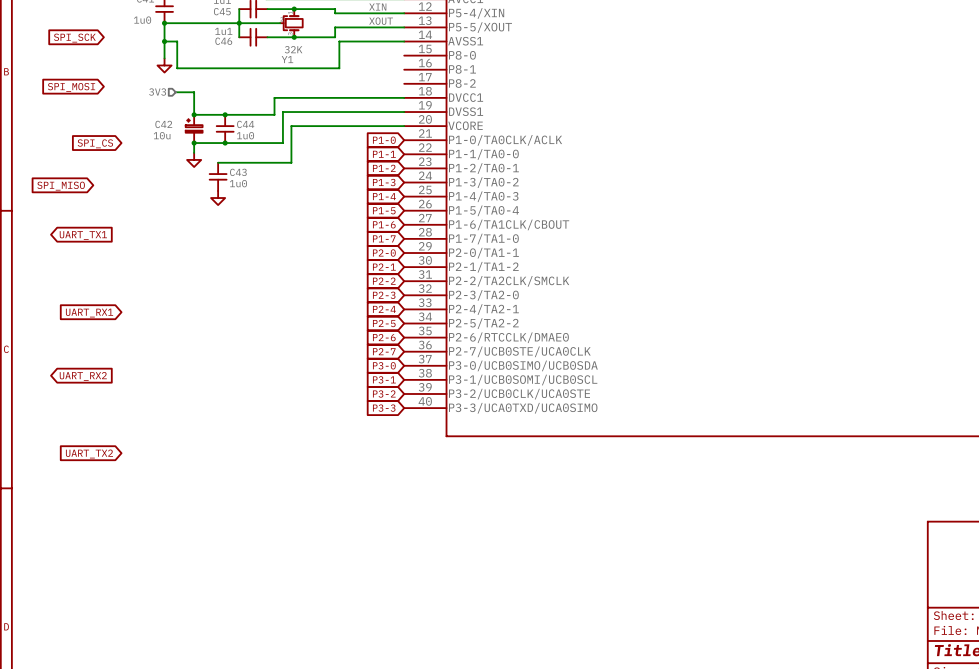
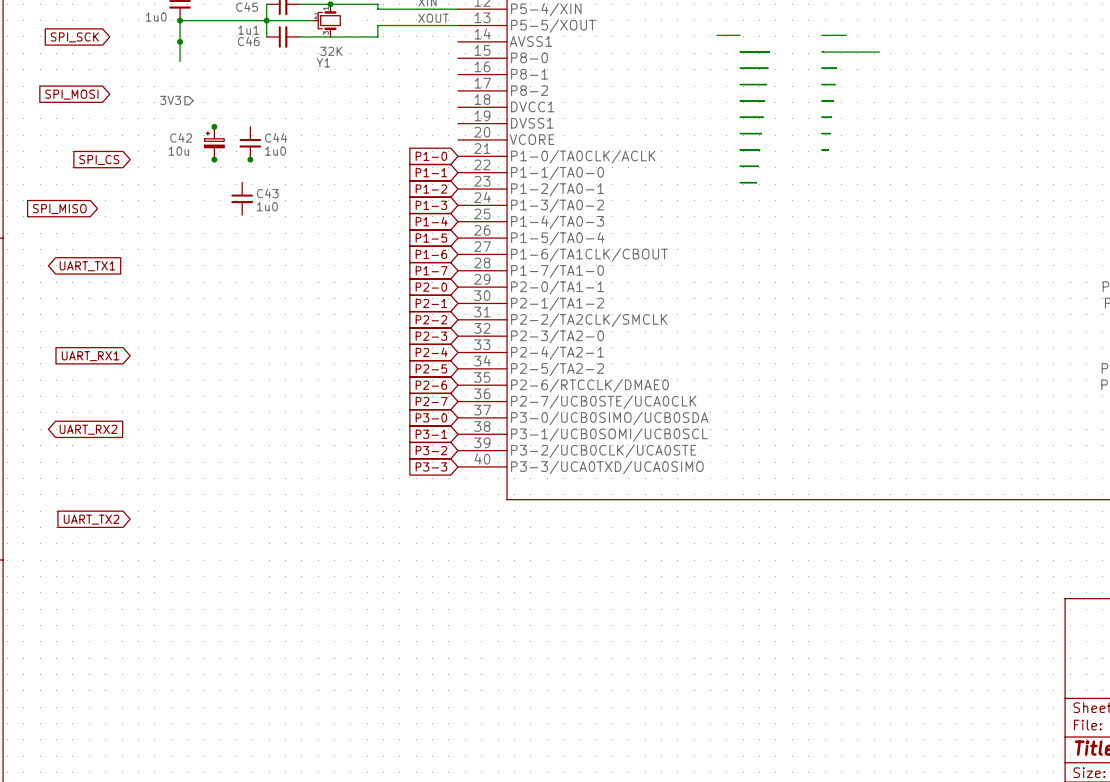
wire: none -> (717, 35) (740, 35)
wire: none -> (821, 35) (846, 35)
junction: (294, 37) -> none
wire: (164, 41) (177, 41) (177, 68) (339, 68) (339, 41) (404, 41) -> none
wire: none -> (740, 51) (769, 51) (740, 52)
wire: none -> (821, 51) (879, 52)
wire: none -> (740, 68) (767, 68) (740, 68)
wire: none -> (821, 68) (836, 68) (822, 68)
power symbol: (164, 65) -> none
wire: none -> (740, 84) (766, 84) (740, 84)
wire: none -> (821, 84) (834, 84) (822, 84)
wire: (175, 92) (194, 92) (194, 114) (274, 114) (274, 97) (404, 97) -> none
wire: none -> (740, 100) (764, 100) (740, 101)
wire: none -> (821, 100) (833, 100) (822, 101)
wire: none -> (740, 117) (762, 117) (740, 117)
wire: none -> (821, 117) (831, 117) (822, 117)
wire: (404, 112) (282, 112) (282, 143) (194, 143) (194, 152) -> none
junction: (225, 114) -> none
wire: none -> (740, 133) (761, 133) (740, 133)
wire: none -> (821, 133) (829, 133) (822, 133)
wire: (404, 126) (291, 126) (291, 162) (218, 162) -> none
wire: none -> (740, 149) (759, 149) (740, 150)
wire: none -> (821, 149) (828, 149) (822, 150)
wire: none -> (740, 166) (757, 166) (740, 166)
power symbol: (194, 159) -> none
wire: none -> (740, 182) (756, 182) (740, 182)
power symbol: (218, 198) -> none

